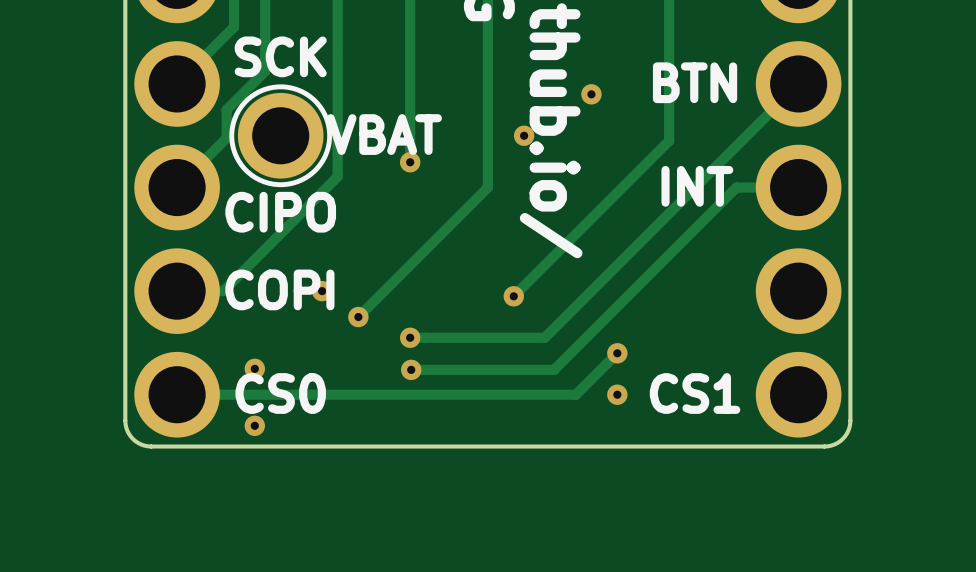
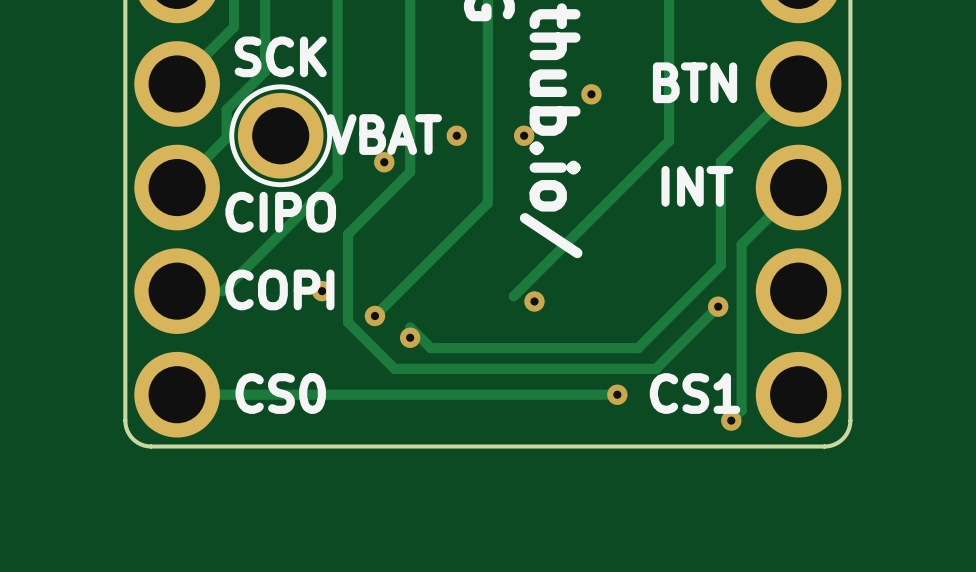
via: none -> (456, 135)
track: (720, 161) (544, 337) (410, 337) -> (720, 161) (720, 265) (638, 348) (430, 348) (410, 327)
track: none -> (410, 162) (410, 172) (348, 234) (348, 322) (394, 368) (656, 368) (718, 306)
via position: (410, 162) -> (384, 162)
track: (487, 187) (358, 317) -> (487, 187) (487, 203) (374, 315)
track: (798, 187) (736, 187) (554, 369) (411, 369) -> (798, 187) (741, 244) (741, 410) (731, 420)
via position: (513, 296) -> (534, 301)
via: none -> (718, 306)
via position: (358, 317) -> (374, 315)
track: (617, 353) (575, 394) -> (617, 394) (575, 394)
via: (617, 353) -> none
via: (254, 368) -> none
via: (411, 369) -> none
via: none -> (731, 420)
via: (254, 425) -> none

